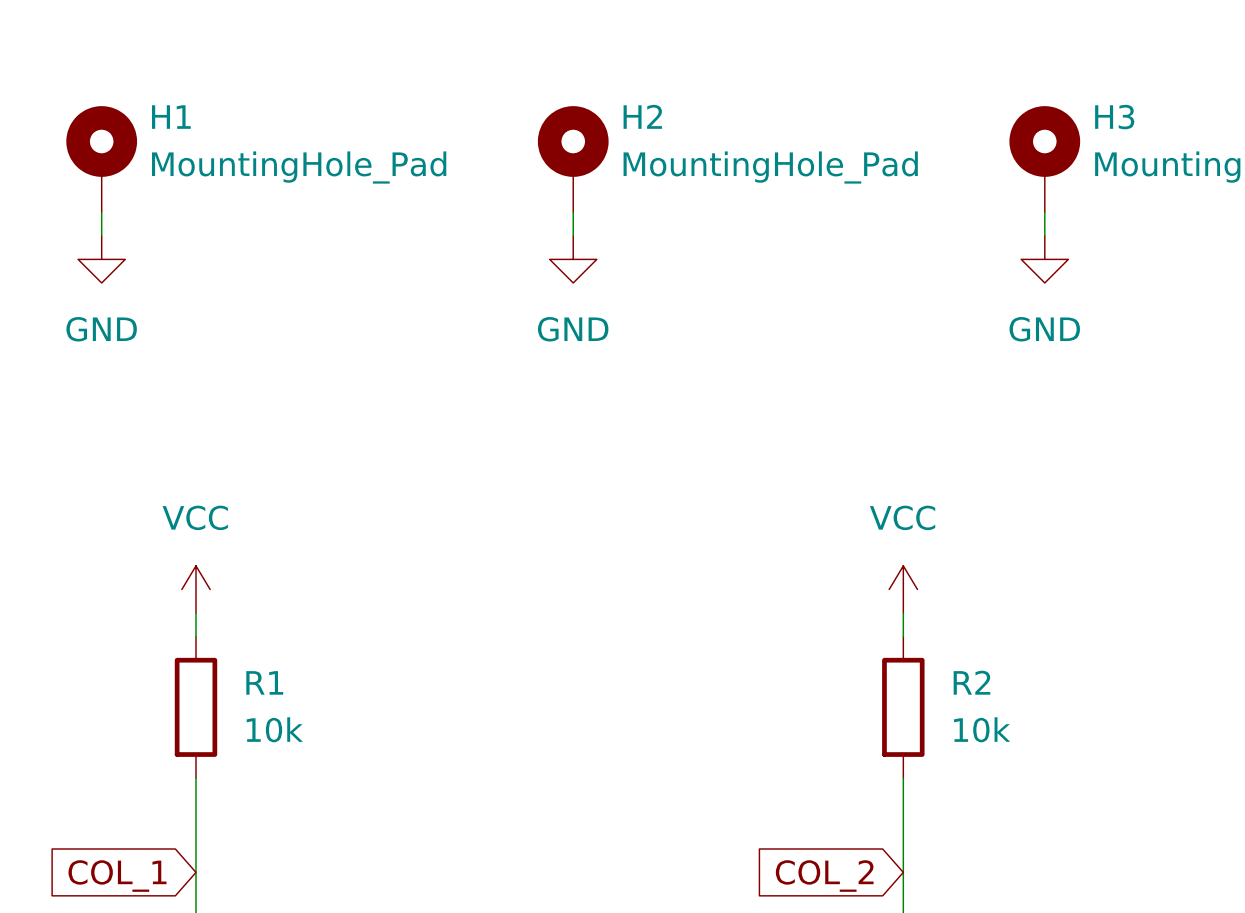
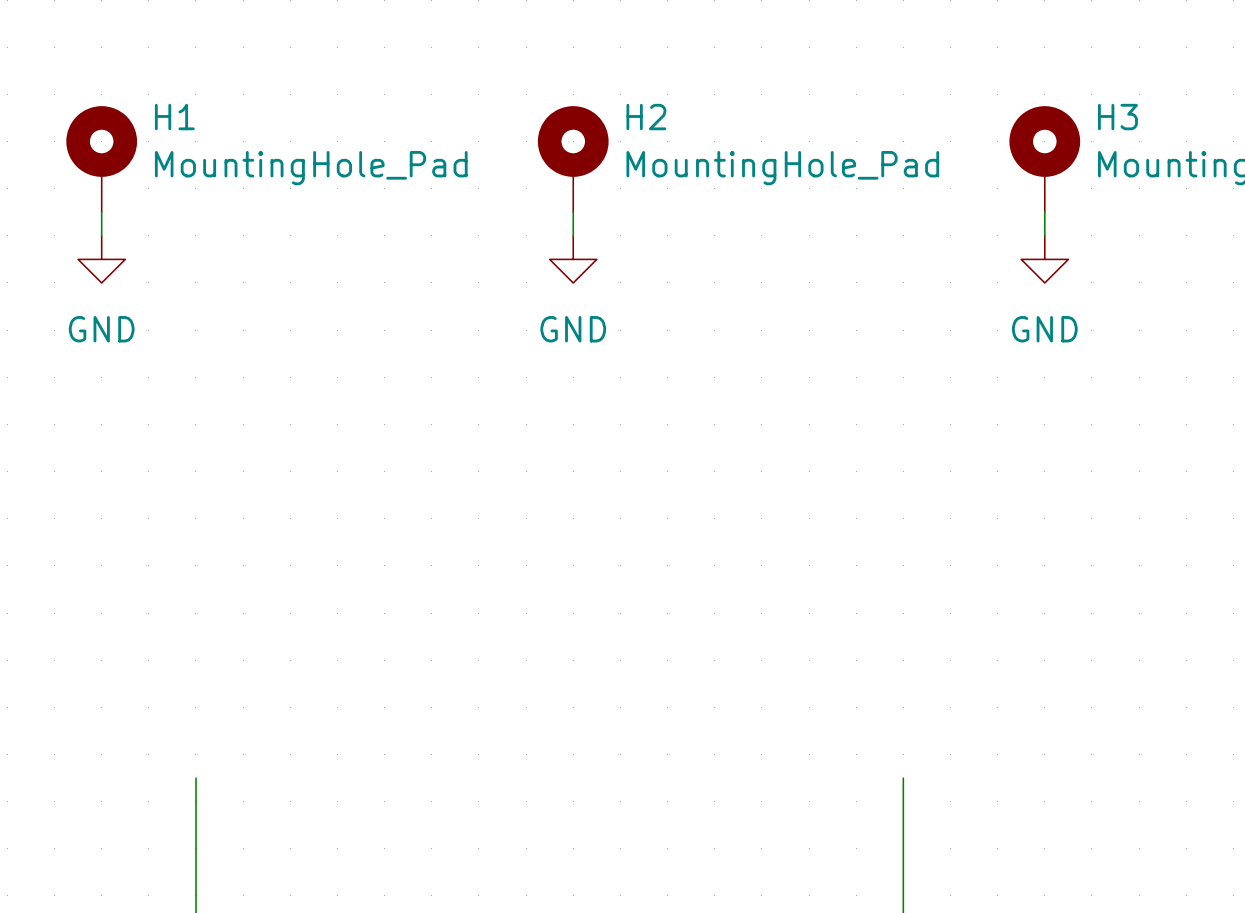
power symbol: VCC (195, 589) -> none
power symbol: VCC (903, 589) -> none
wire: (195, 613) (195, 636) -> none
wire: (903, 613) (903, 636) -> none
R1: 10k (195, 707) -> none
R2: 10k (903, 707) -> none
global label: COL_1 (117, 876) -> none
global label: COL_2 (824, 876) -> none

